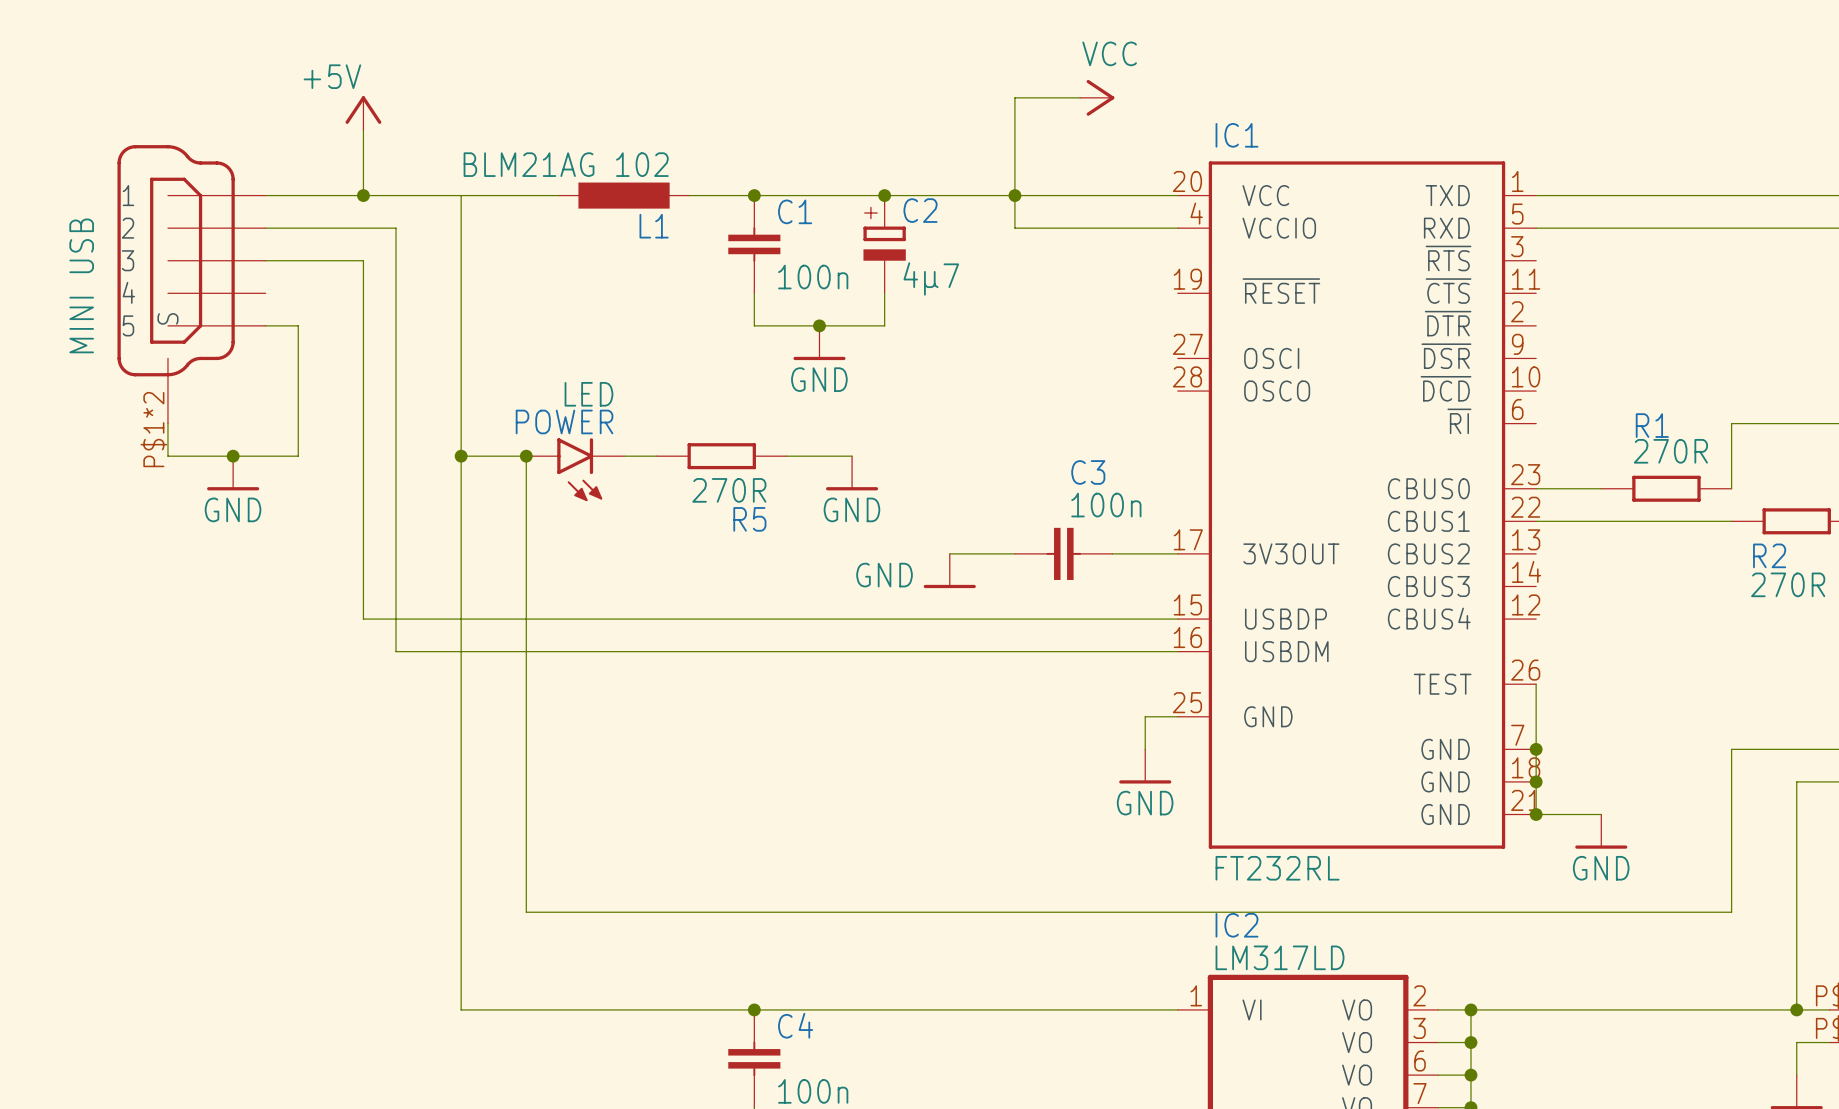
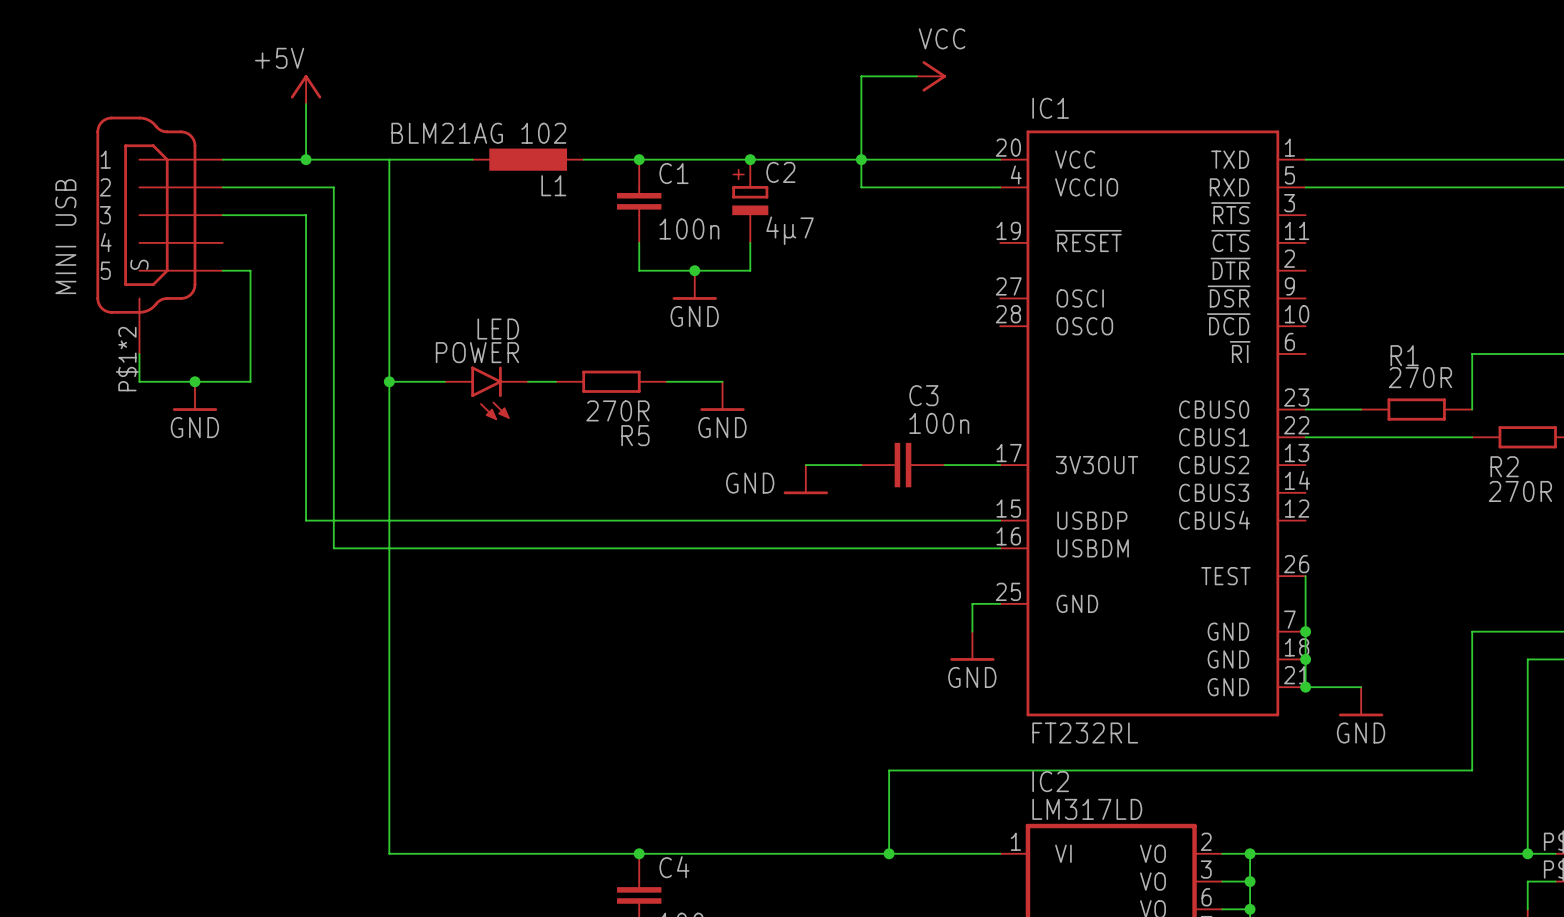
wire: (526, 456) (526, 912) (1047, 912) -> (889, 853) (889, 770)
junction: (526, 456) -> none
junction: none -> (889, 853)

